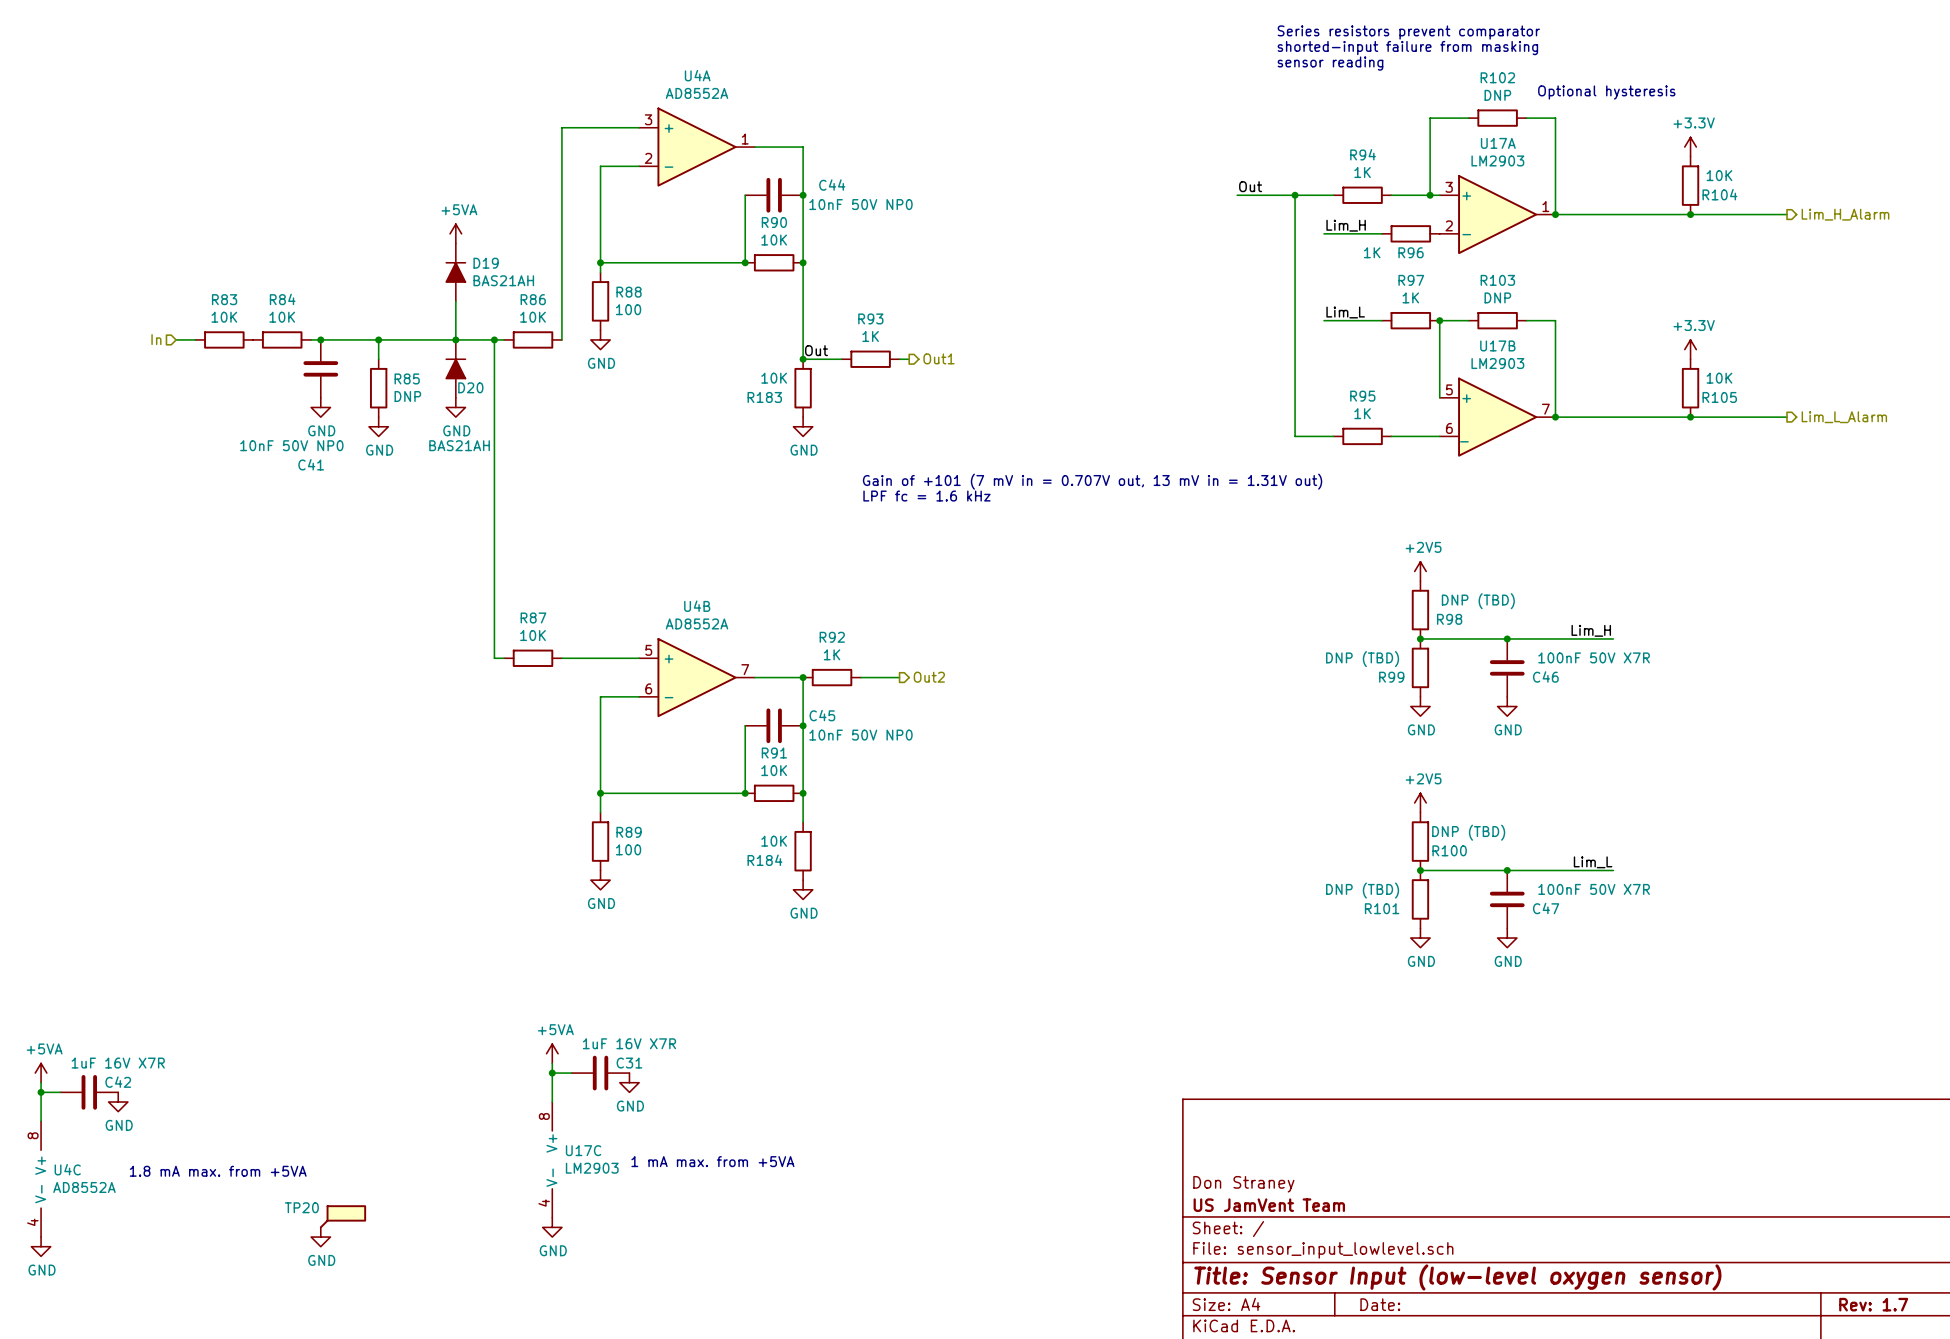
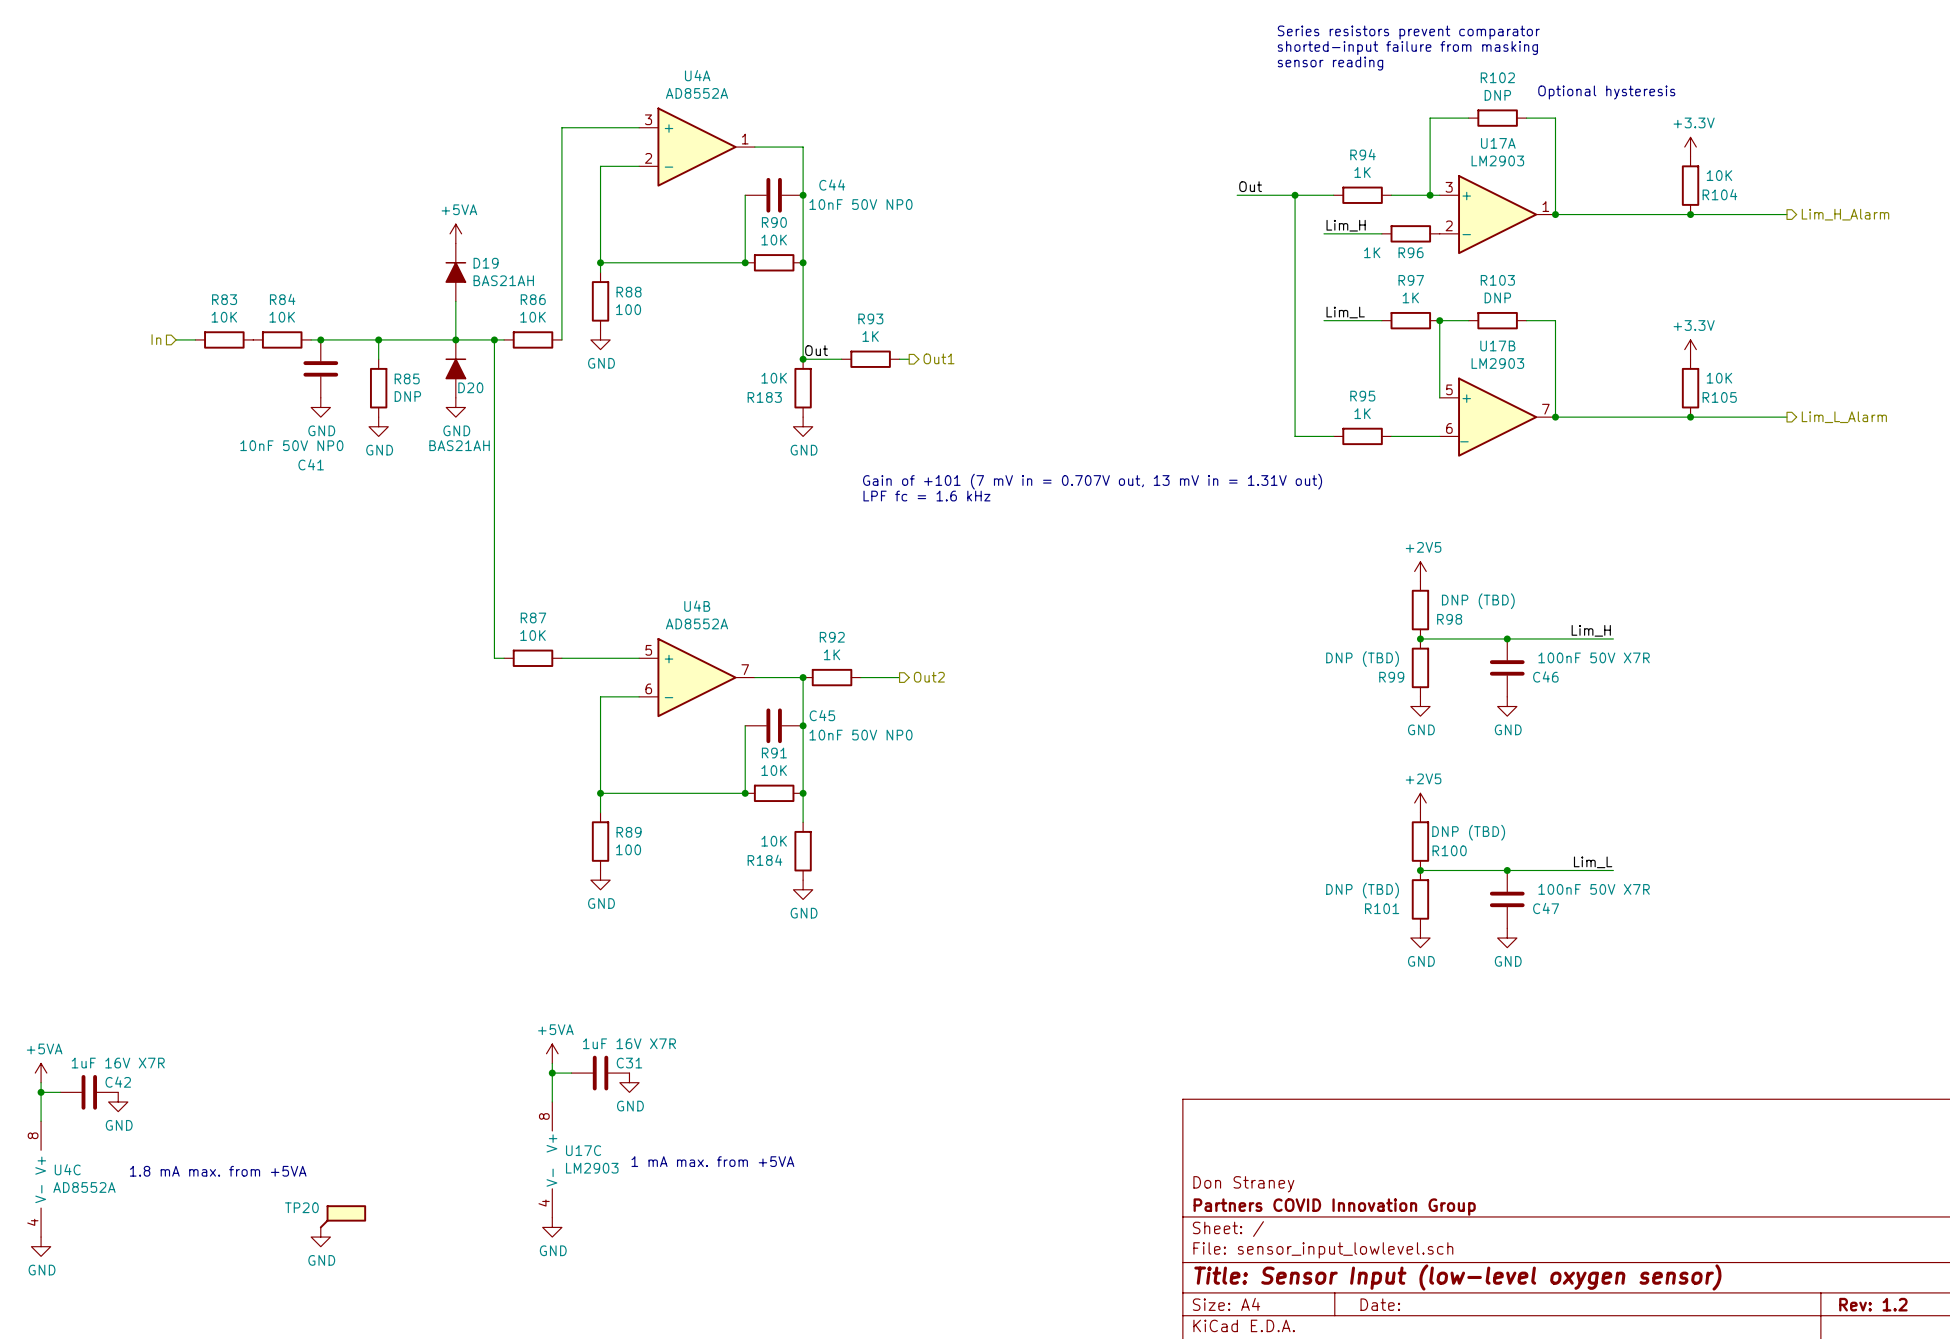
title block: US JamVent Team (1269, 1205) -> Partners COVID Innovation Group (1334, 1207)
title block: Rev: 1.7 (1873, 1304) -> Rev: 1.2 (1873, 1304)

